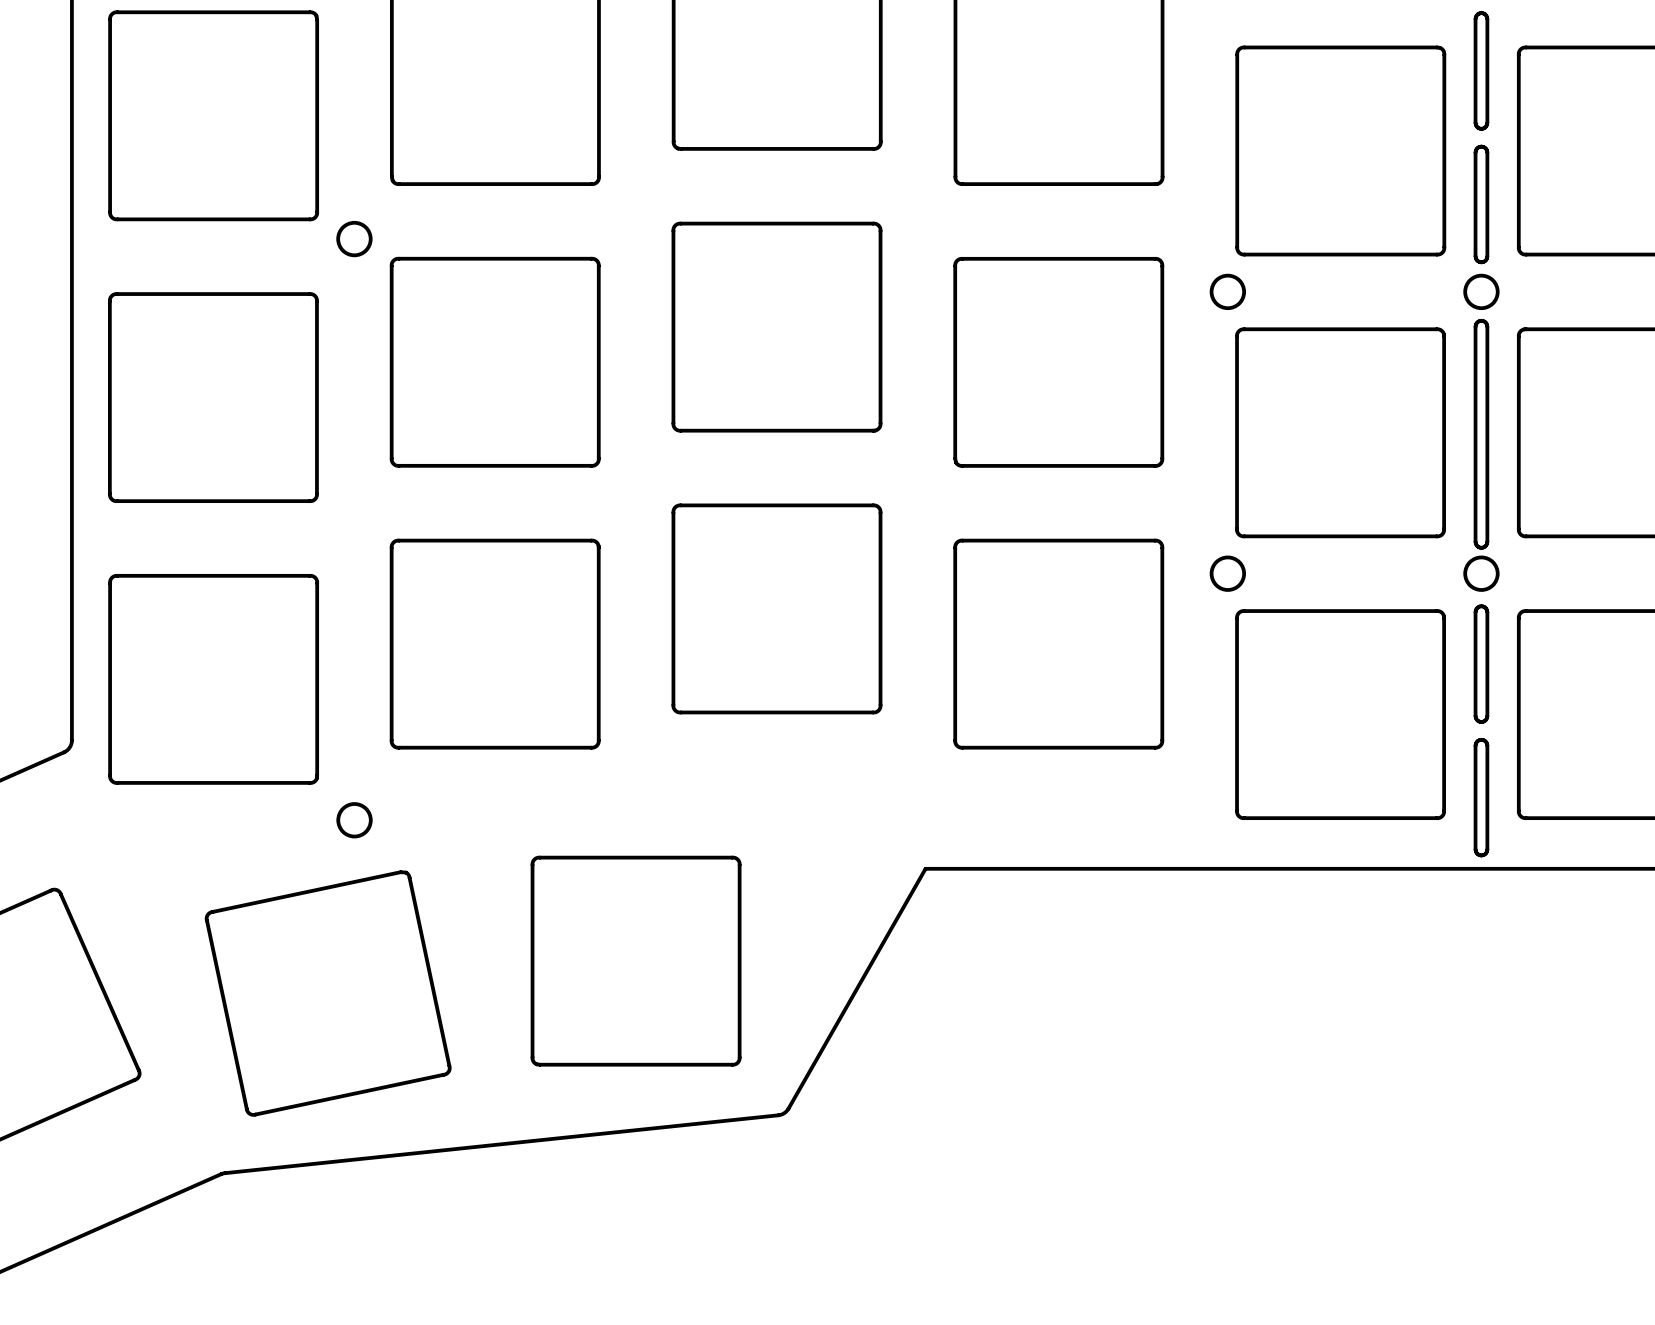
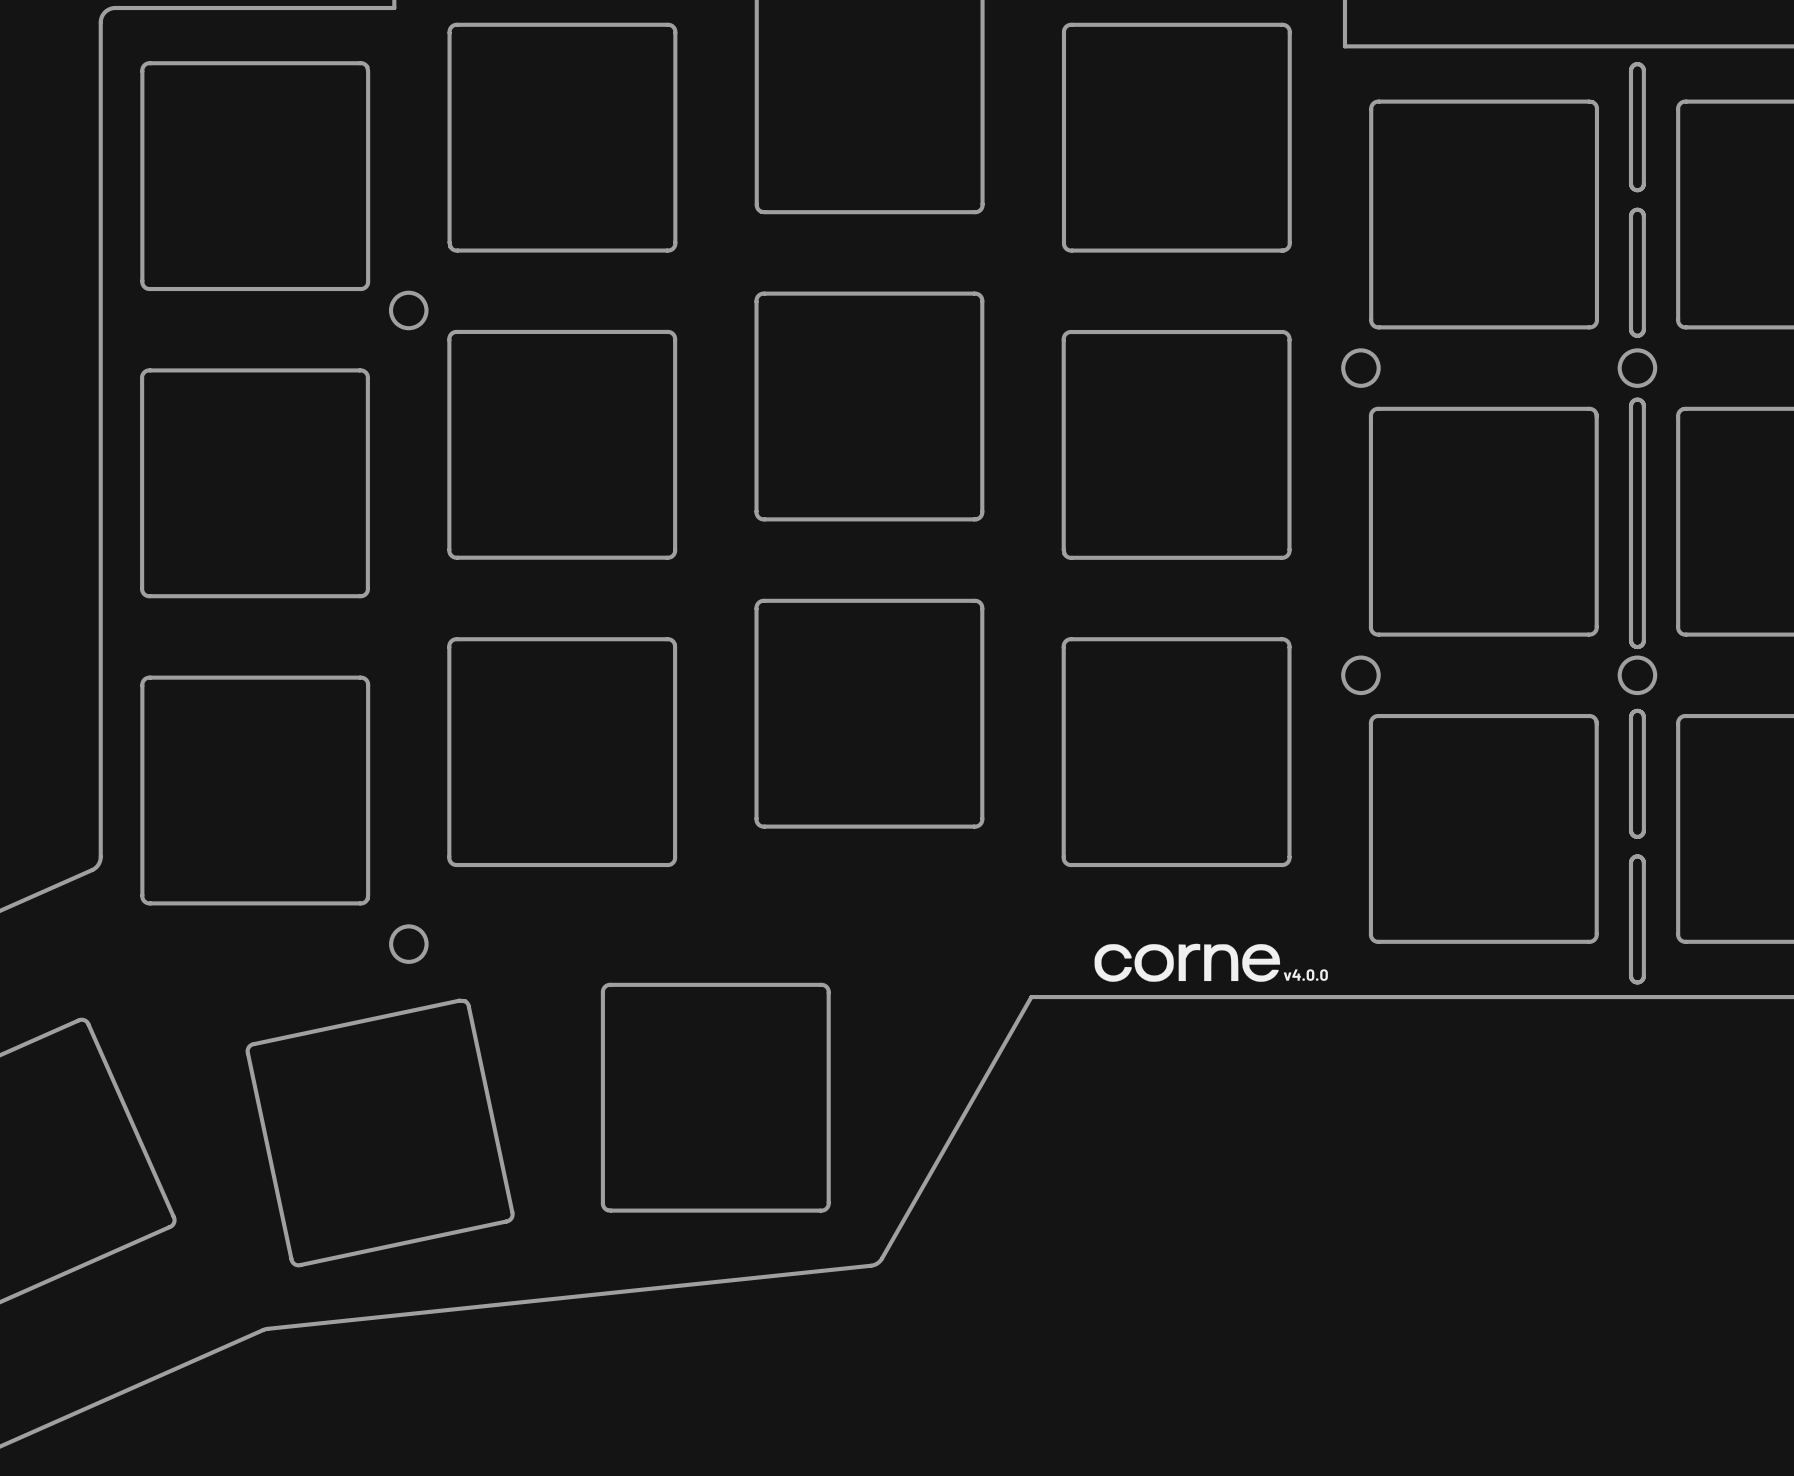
drawing: none -> [1094, 943, 1281, 982]
text: none -> v4.0.0 (1305, 975)

